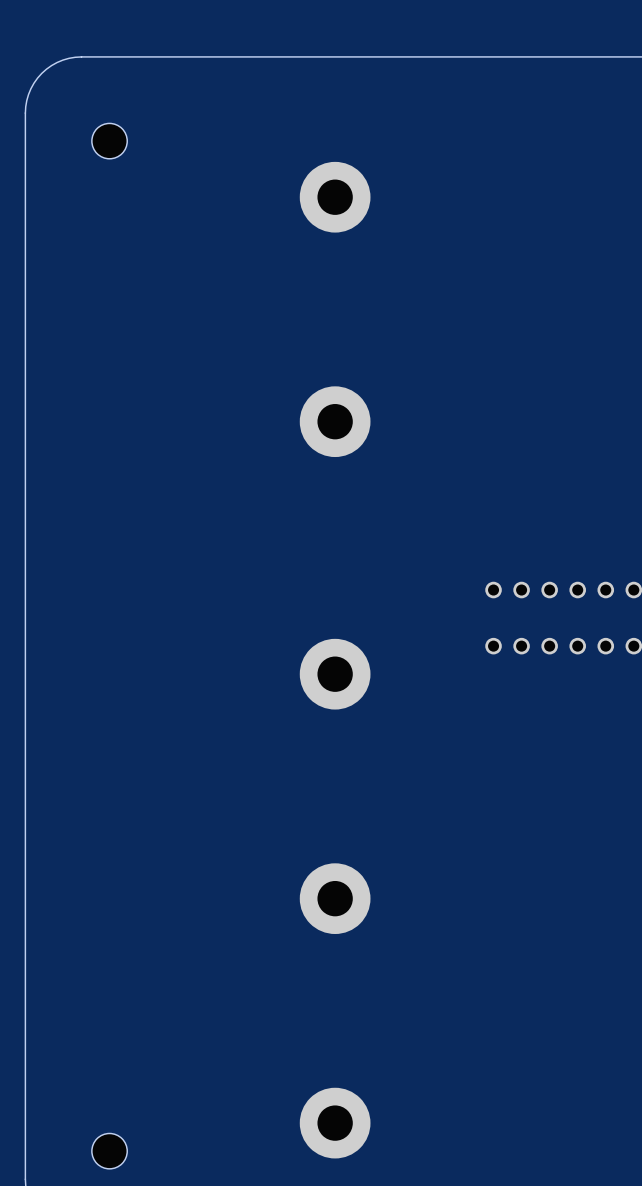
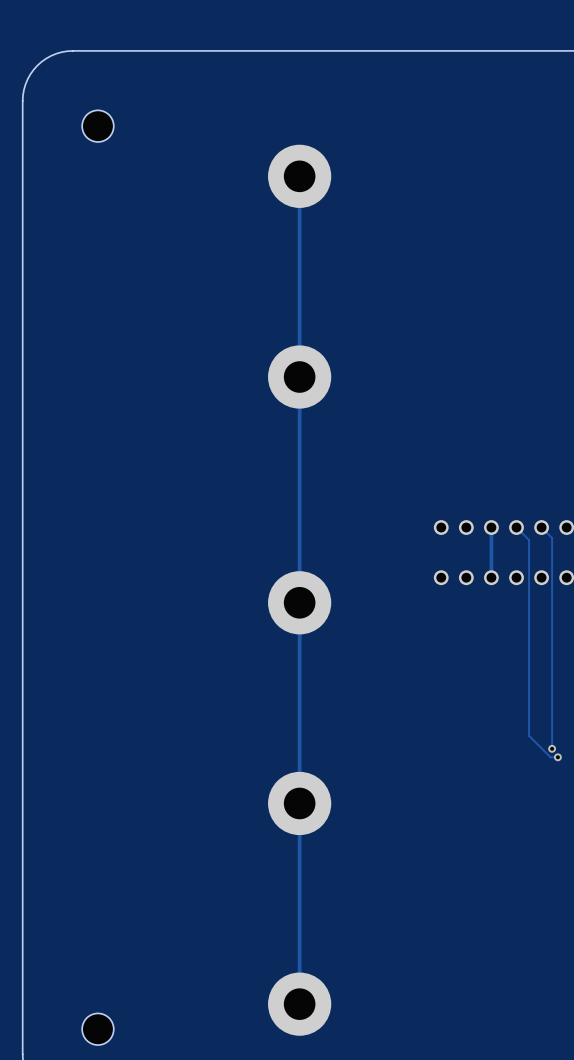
track: none -> (299, 176) (299, 1004)
track: none -> (491, 527) (491, 577)
track: none -> (516, 527) (529, 540) (529, 735) (550, 757) (557, 757)
track: none -> (541, 527) (552, 538) (552, 748)
via: none -> (552, 748)
via: none -> (557, 757)

